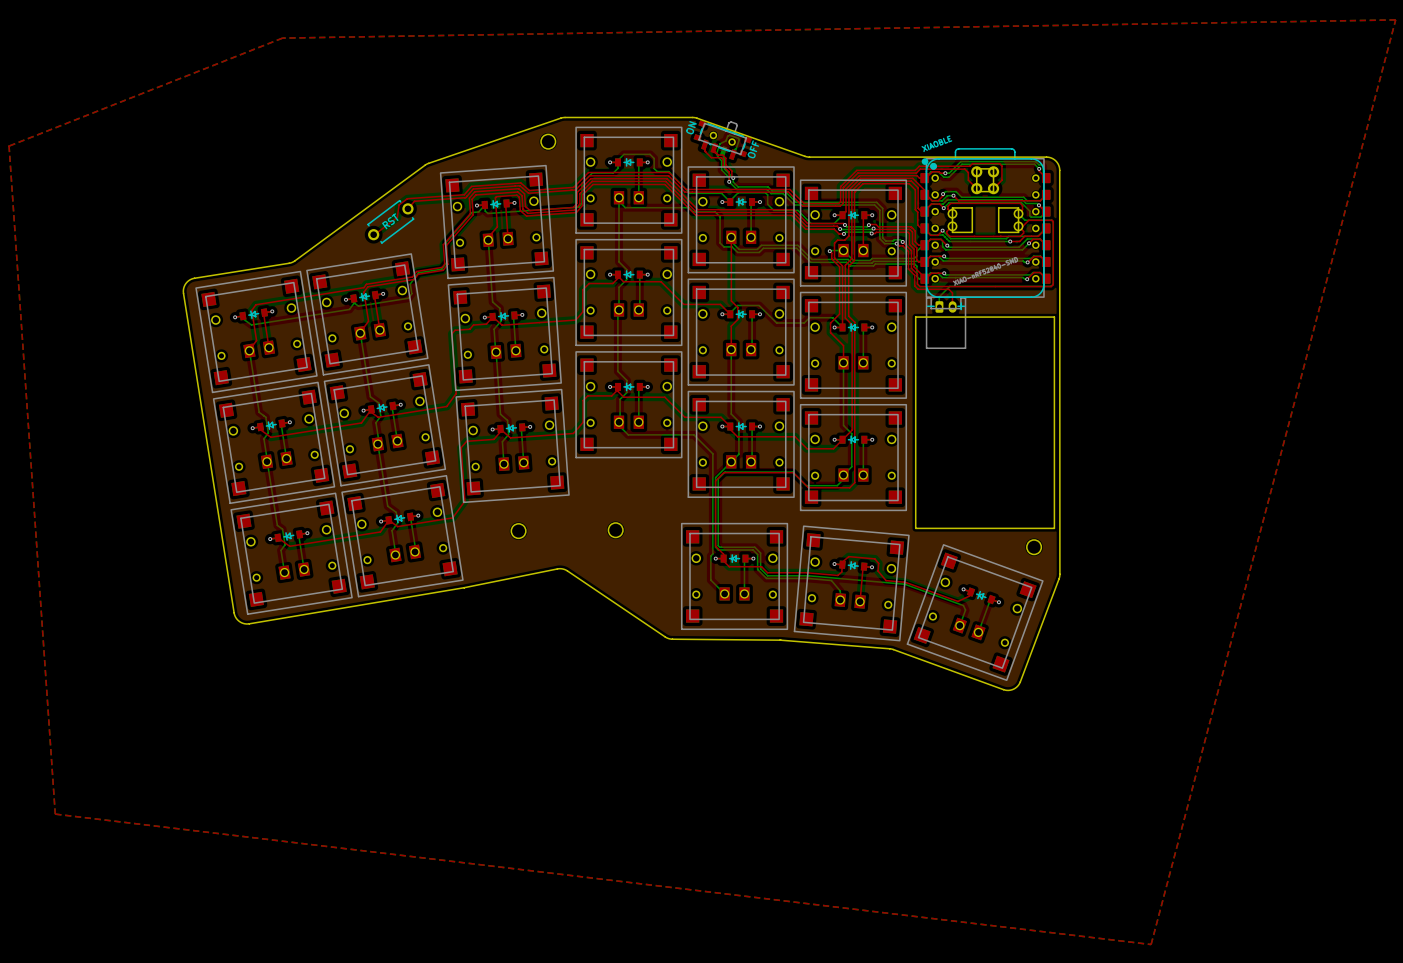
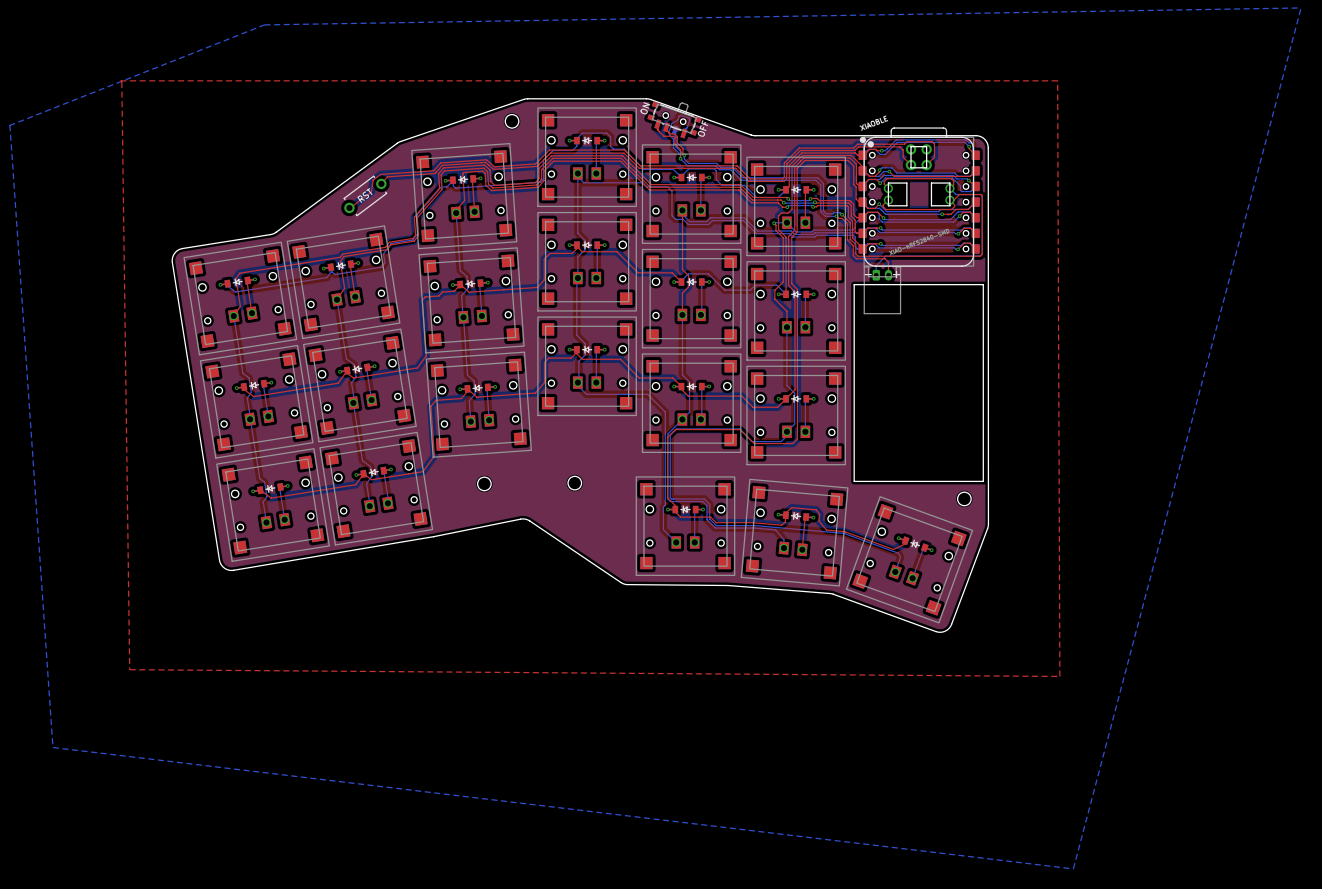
top zone outline: (1395, 19) (1151, 944) (55, 814) (9, 145) (282, 38) (1395, 19) -> (120, 80) (129, 669) (1059, 676) (1057, 80) (120, 80)

